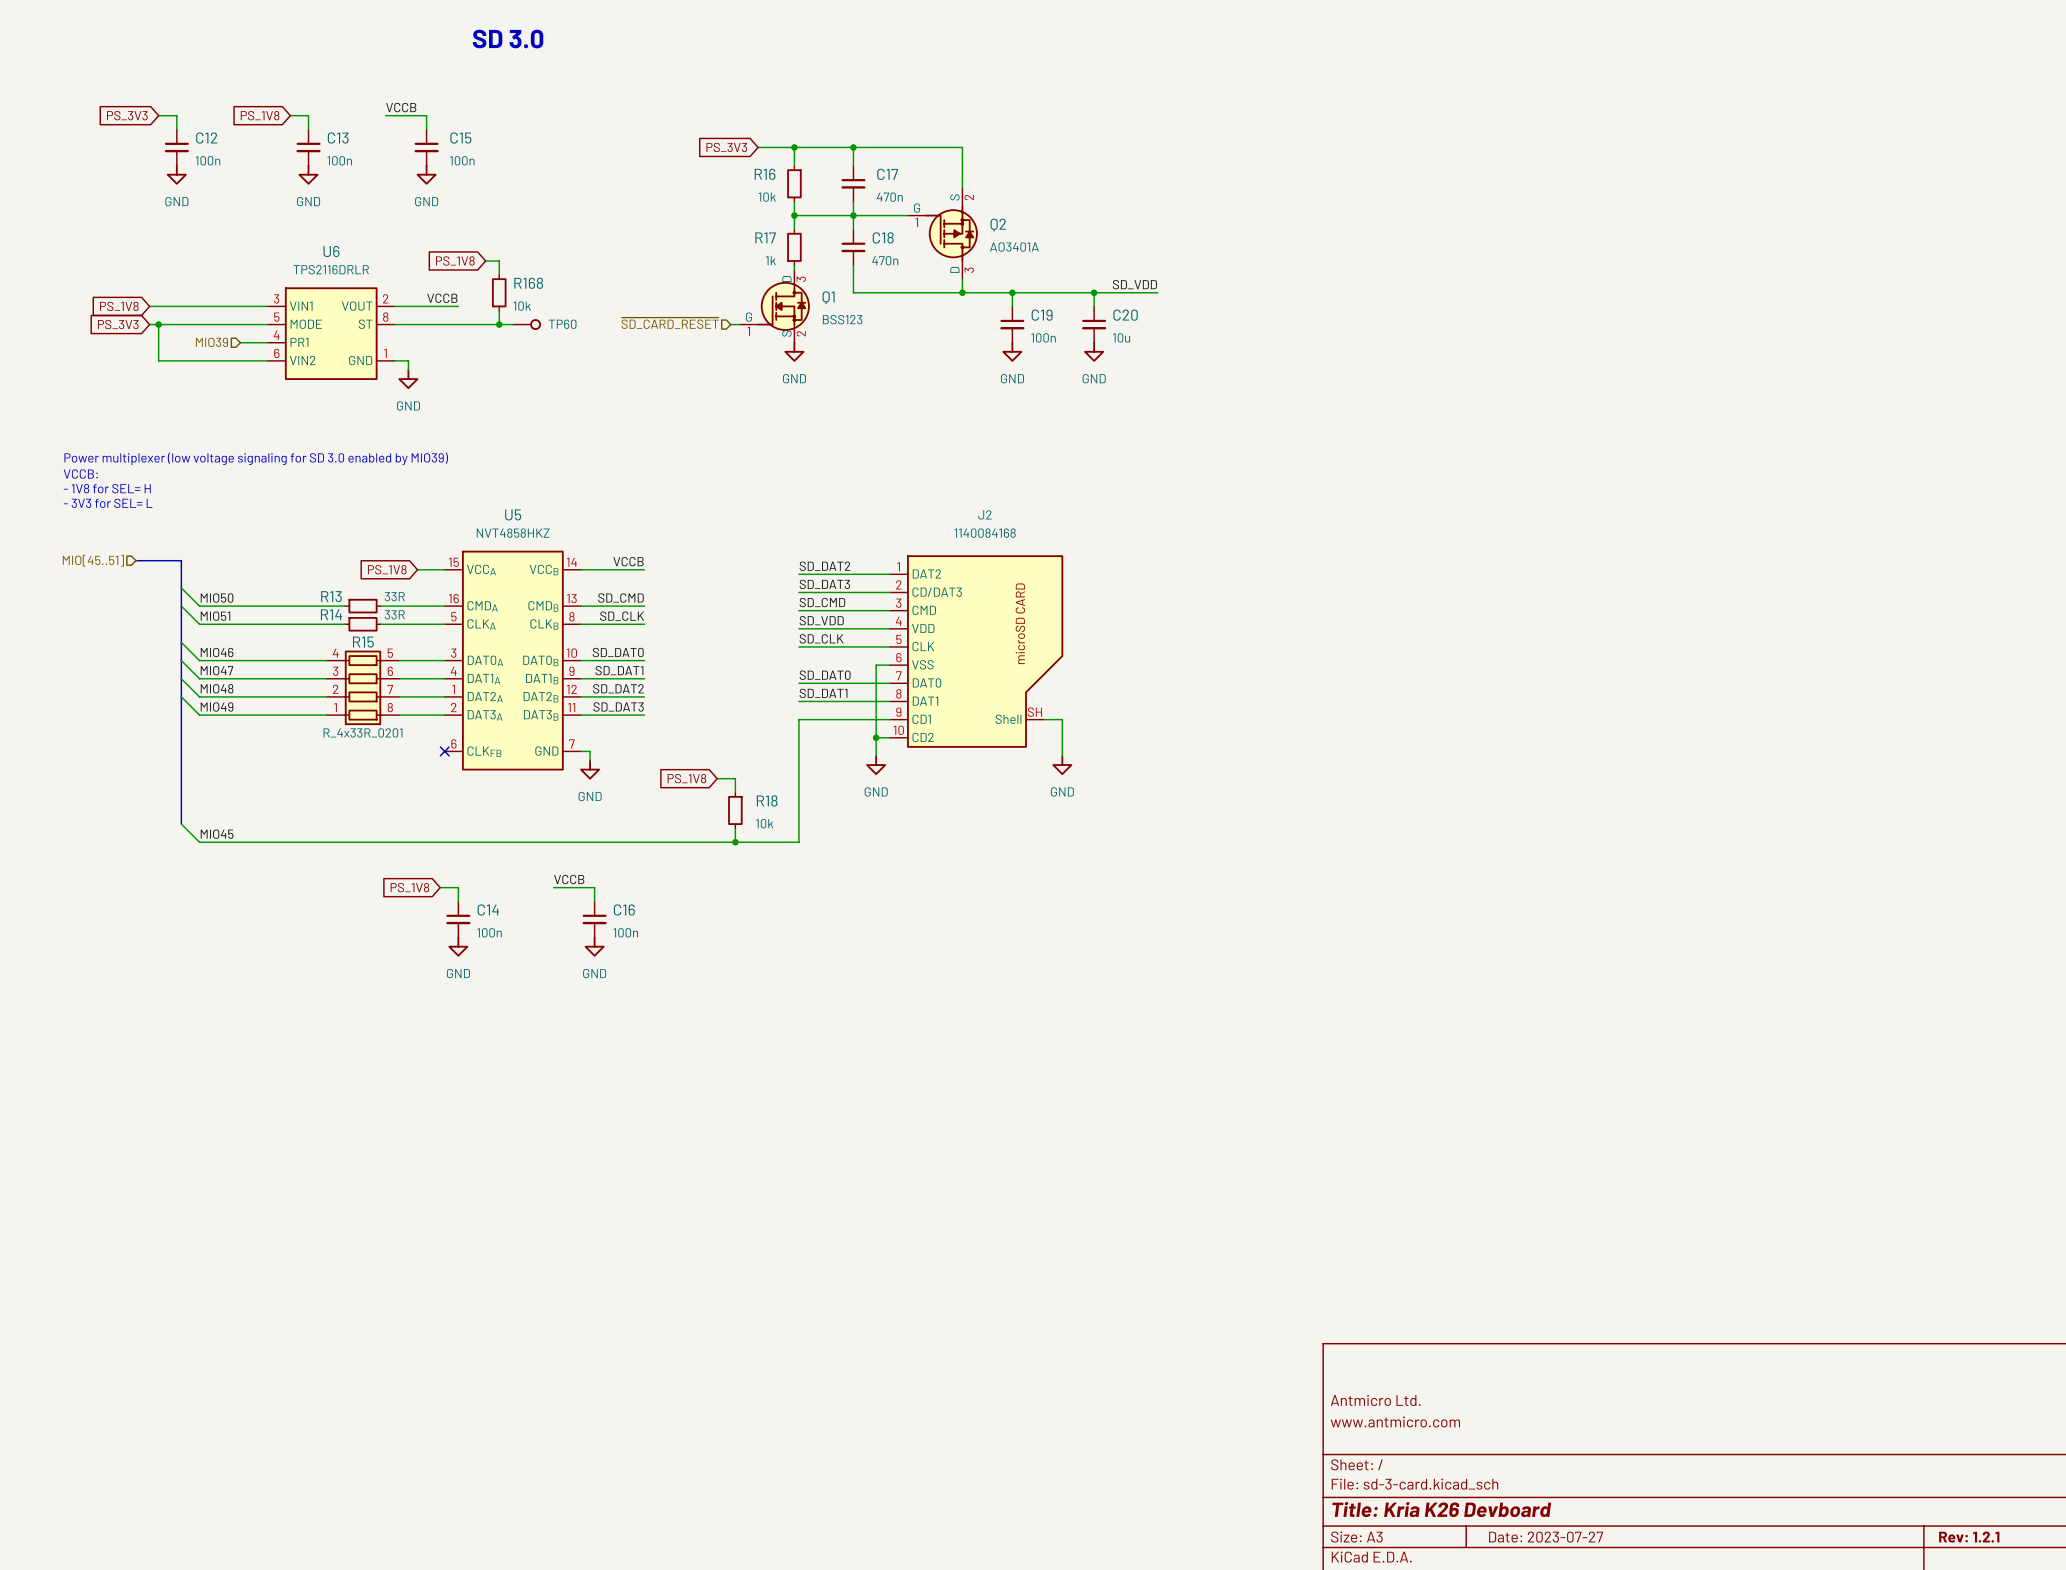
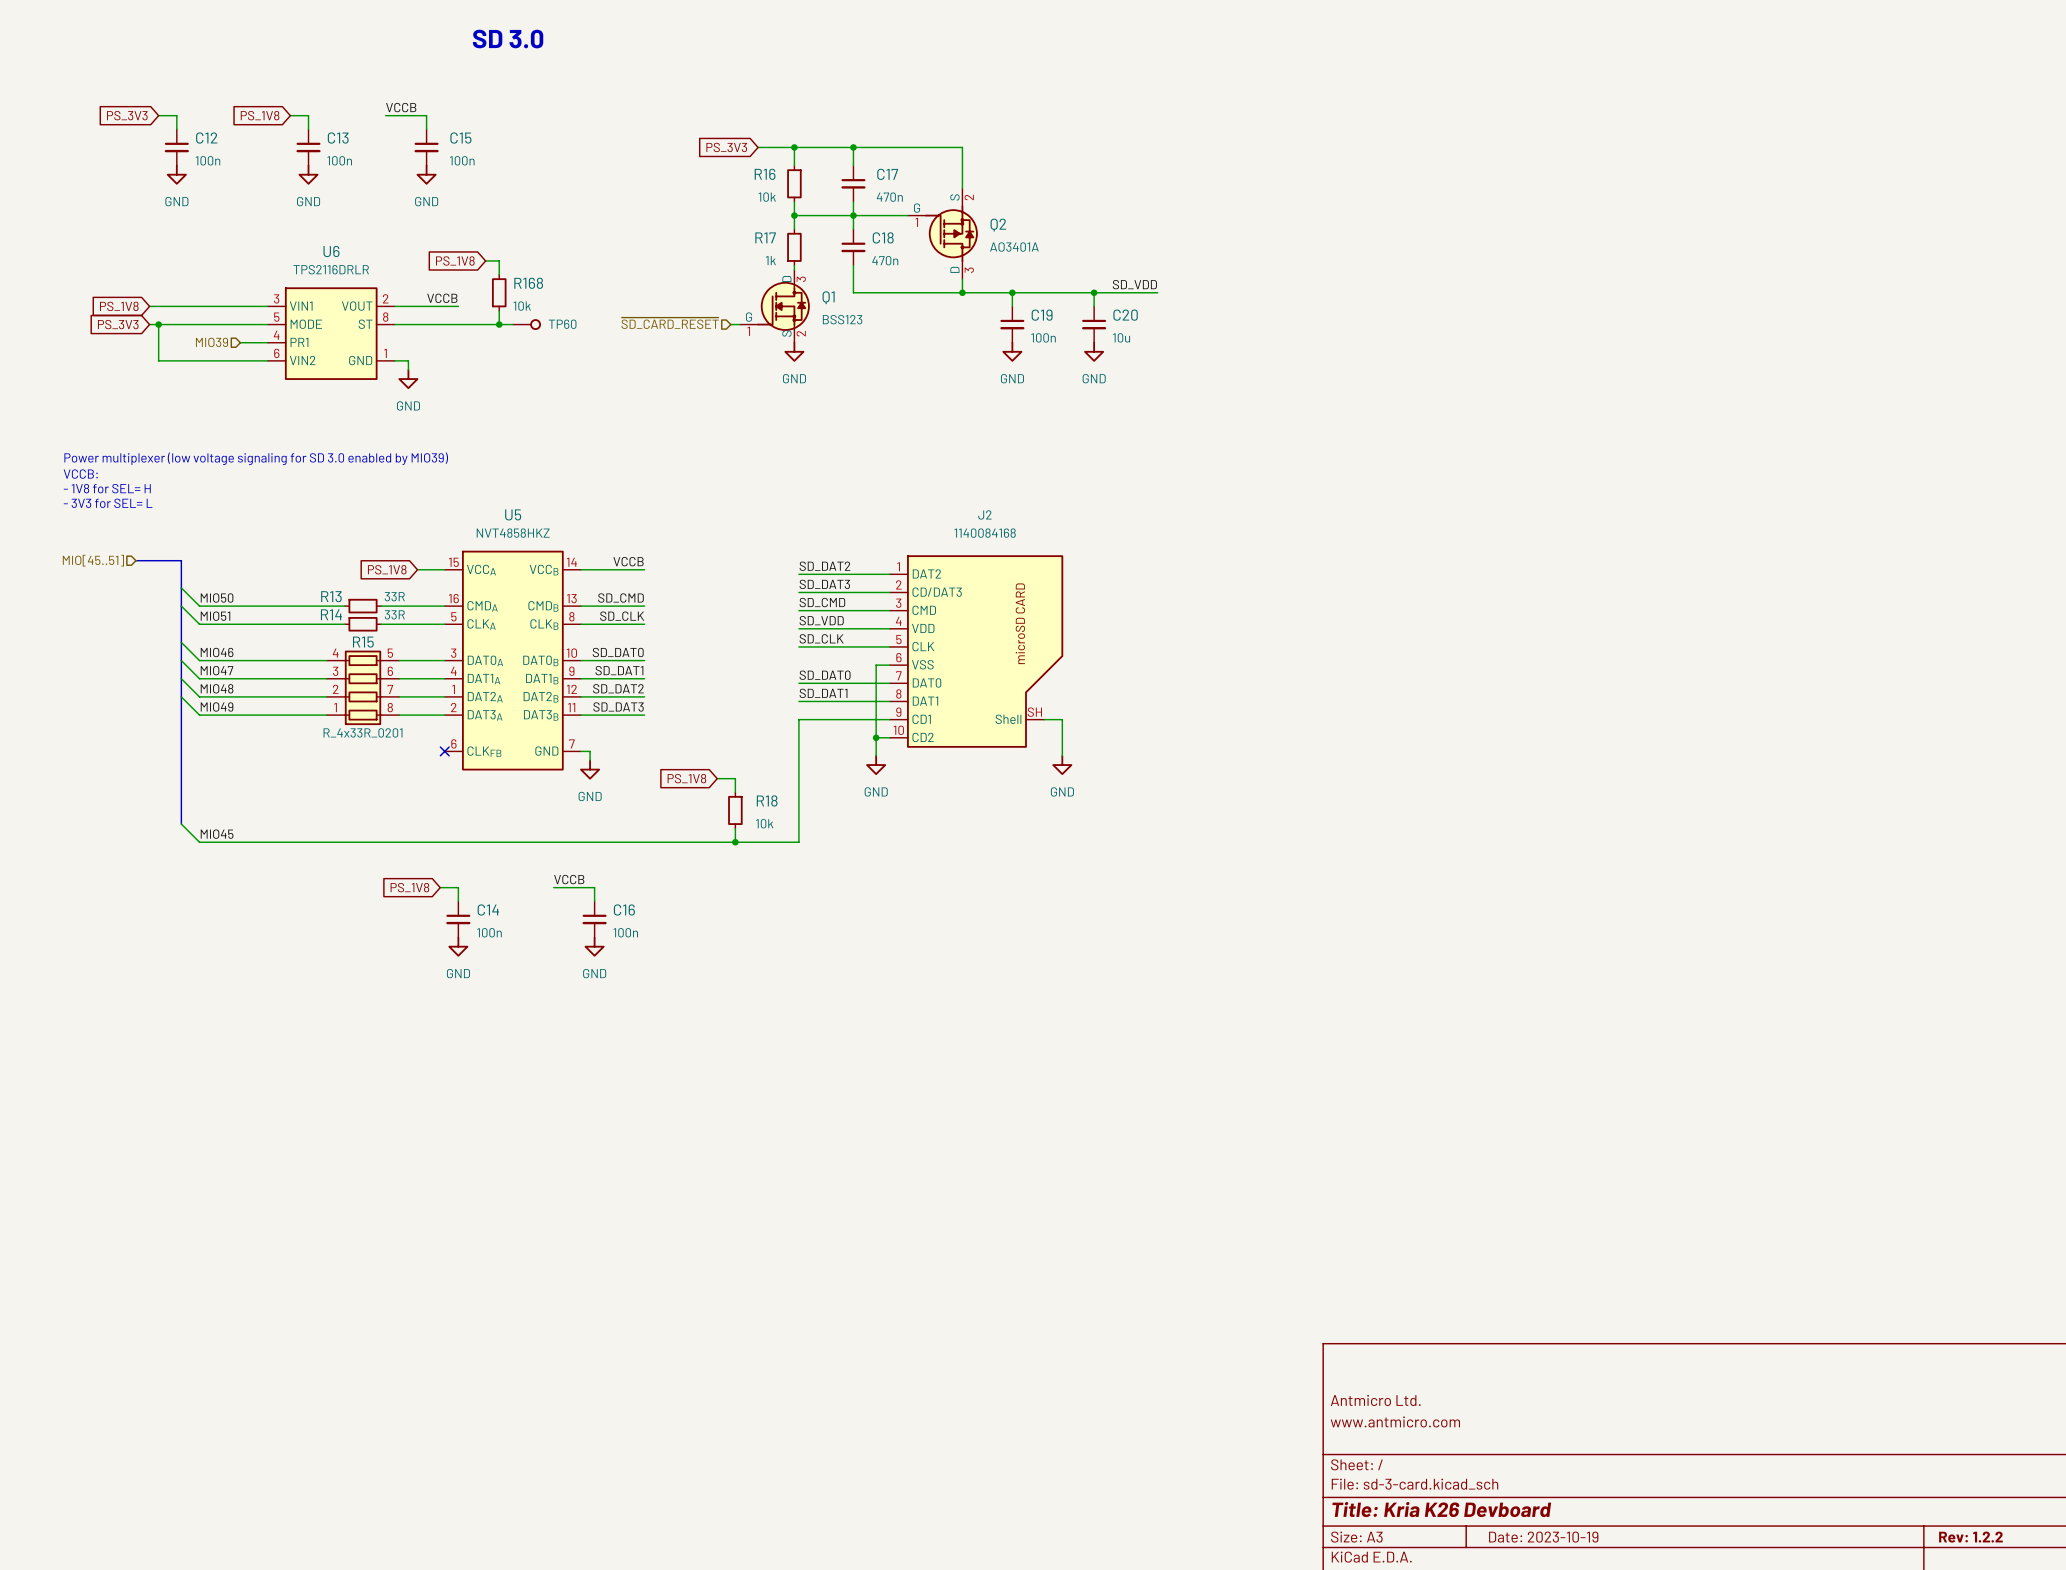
title block: Date: 2023-07-27 (1546, 1537) -> Date: 2023-10-19 (1543, 1537)
title block: Rev: 1.2.1 (1969, 1537) -> Rev: 1.2.2 (1970, 1537)

